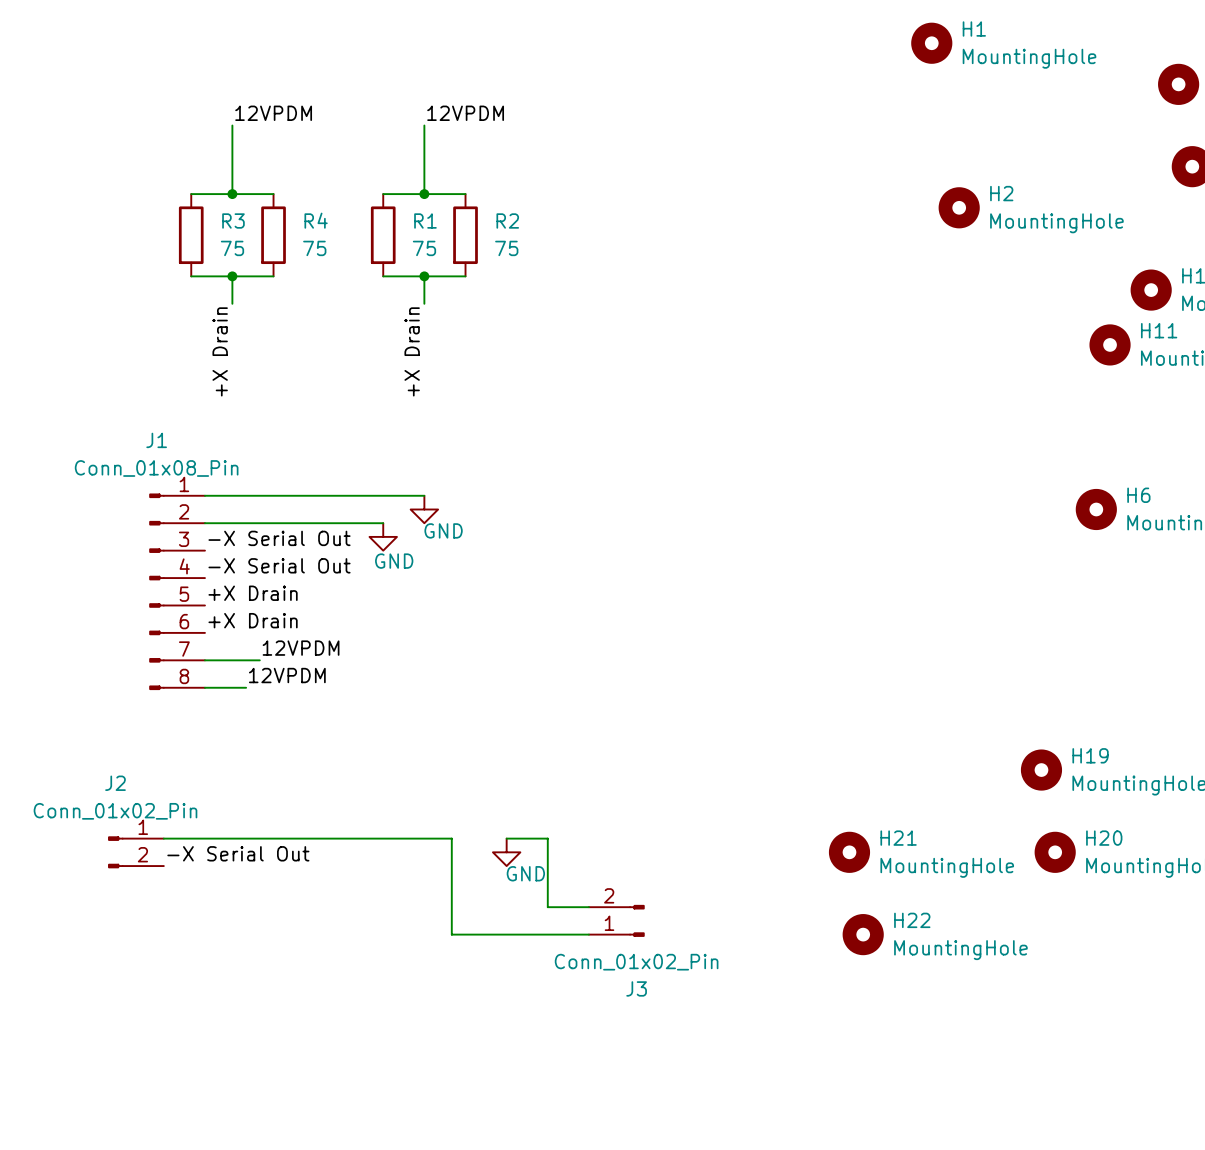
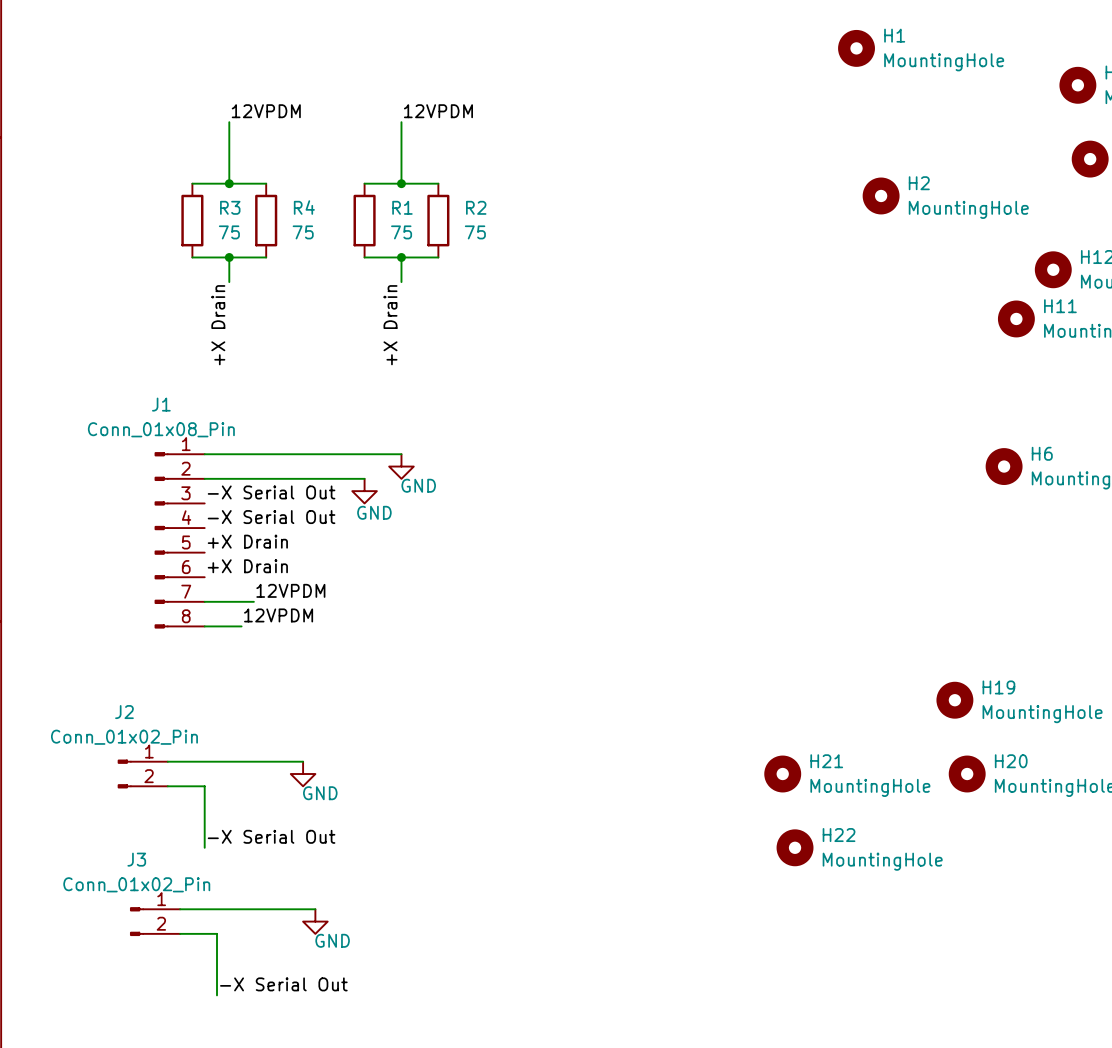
wire: (314, 838) (451, 838) (451, 934) (588, 934) -> none
wire: (506, 838) (547, 838) (547, 907) (588, 907) -> none
power symbol: none -> GND (303, 774)
power symbol: GND (506, 852) -> none
label position: -X Serial Out (238, 853) -> -X Serial Out (271, 836)
wire: none -> (167, 786) (204, 786) (204, 847)
J3 position: (616, 920) -> (155, 921)
J3 rotation: 0° (636, 920) -> 180° (137, 921)
wire: none -> (180, 909) (315, 909)
power symbol: none -> GND (315, 921)
wire: none -> (180, 933) (217, 933) (217, 995)
label: none -> -X Serial Out (283, 984)

